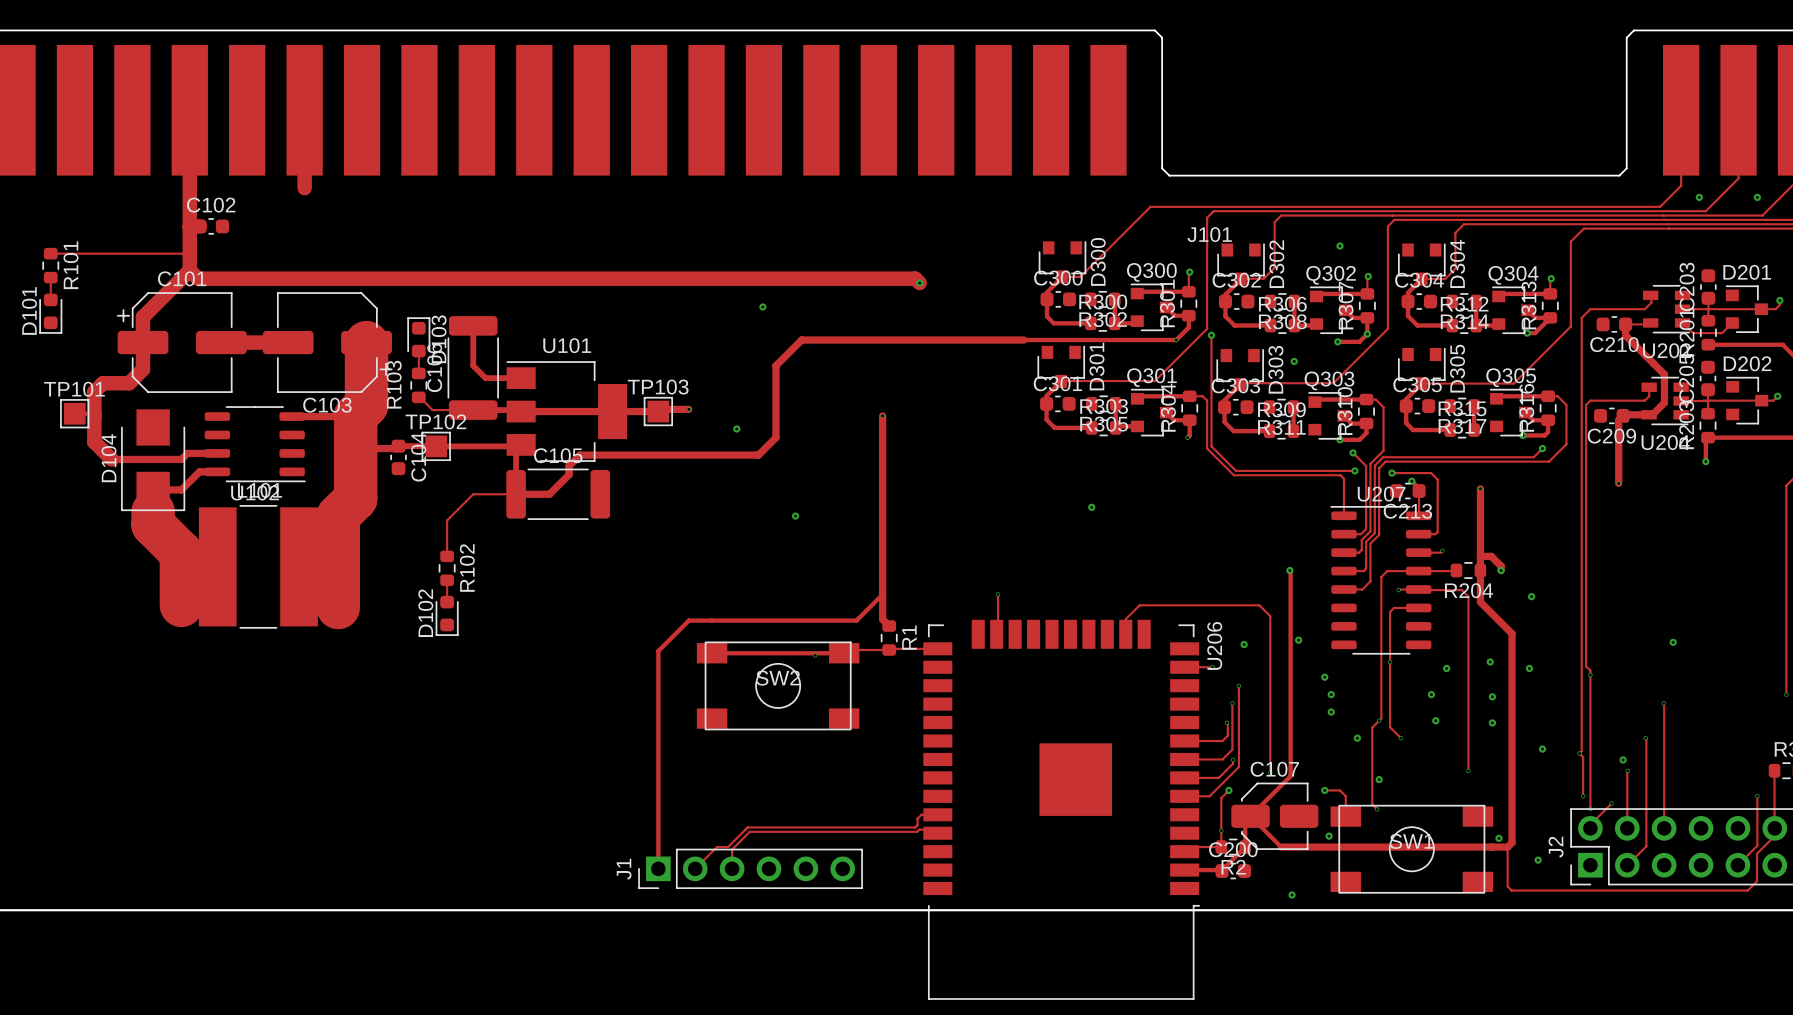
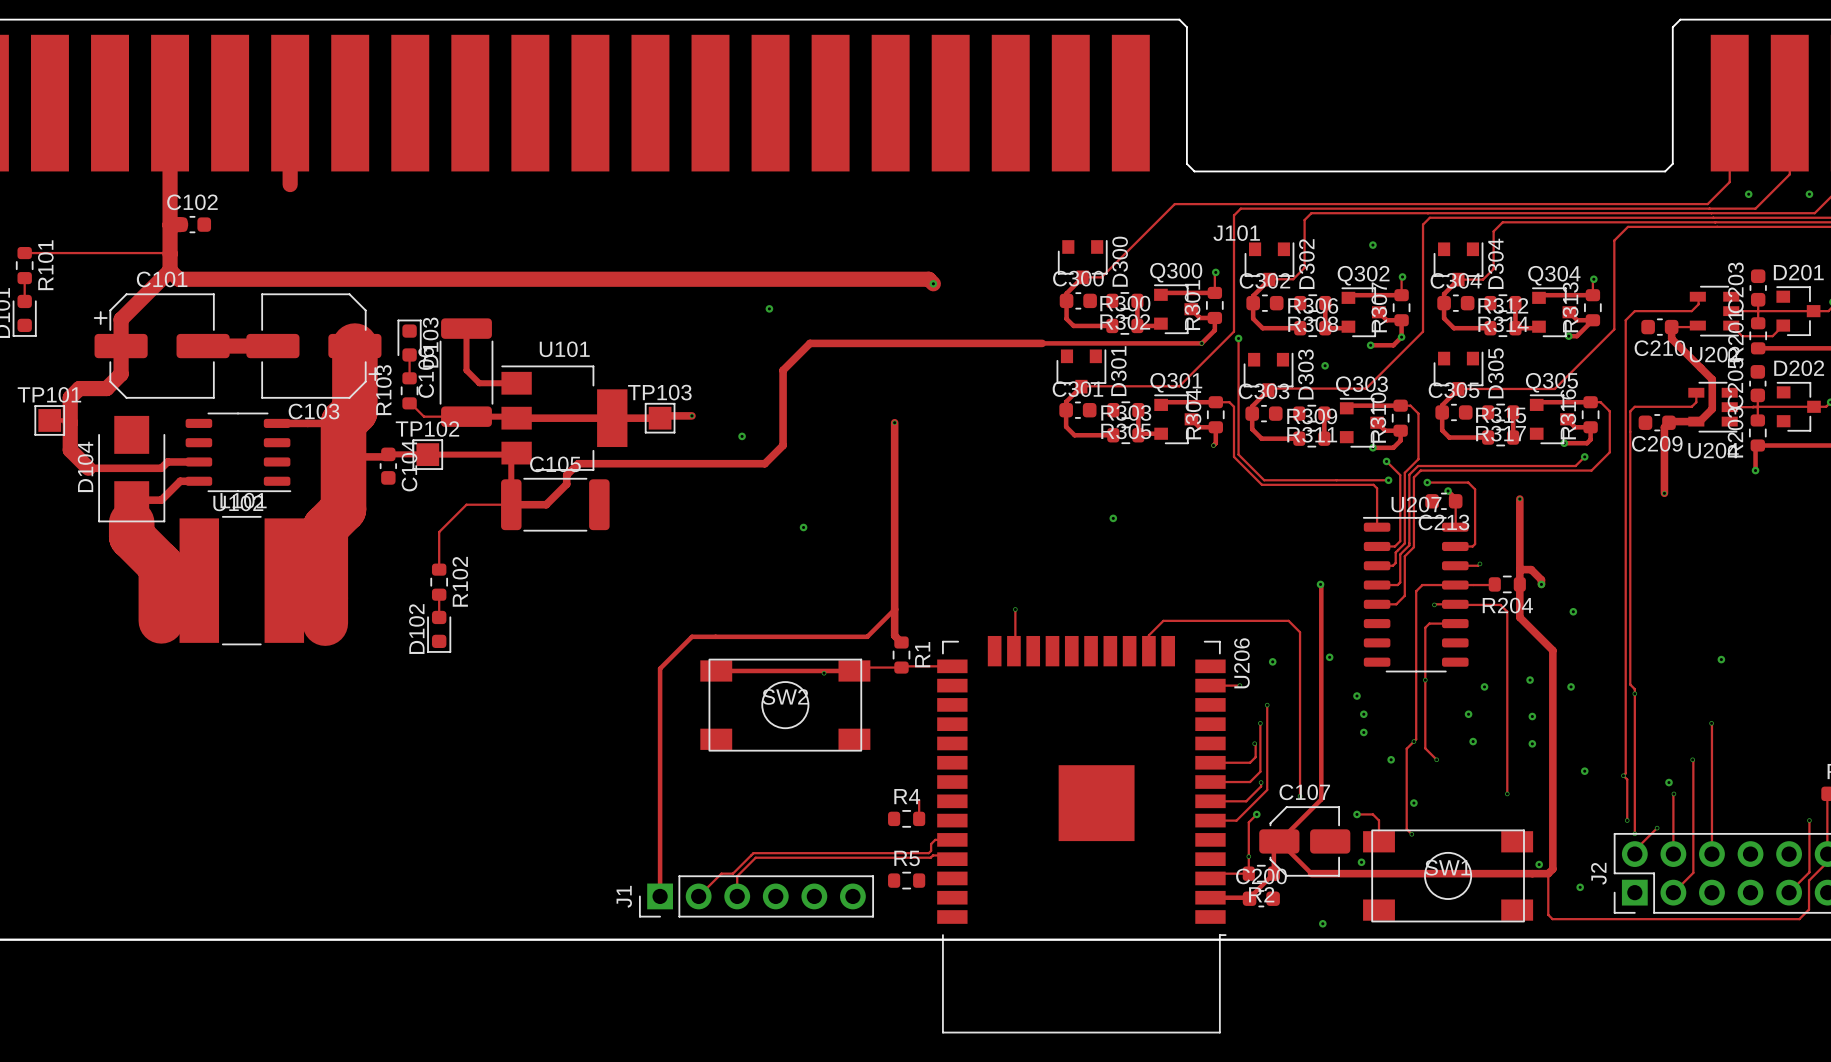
track: none -> (919, 800) (919, 818)
R4: none -> (906, 818)
R5: none -> (906, 880)

